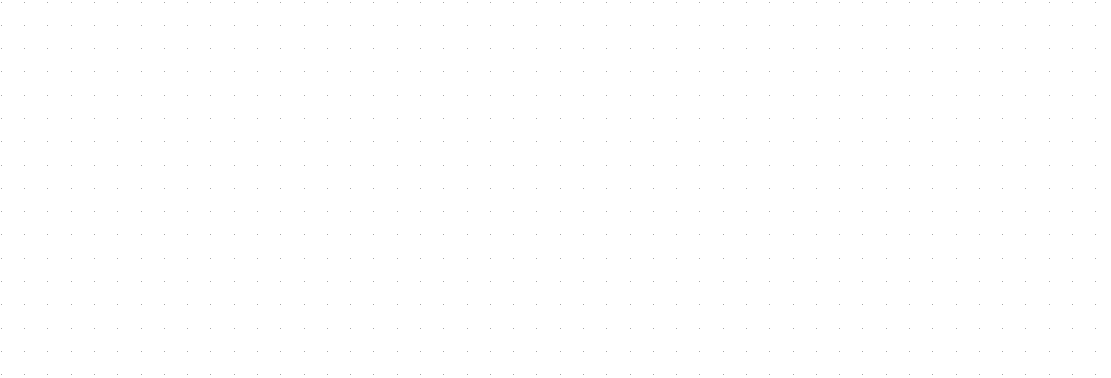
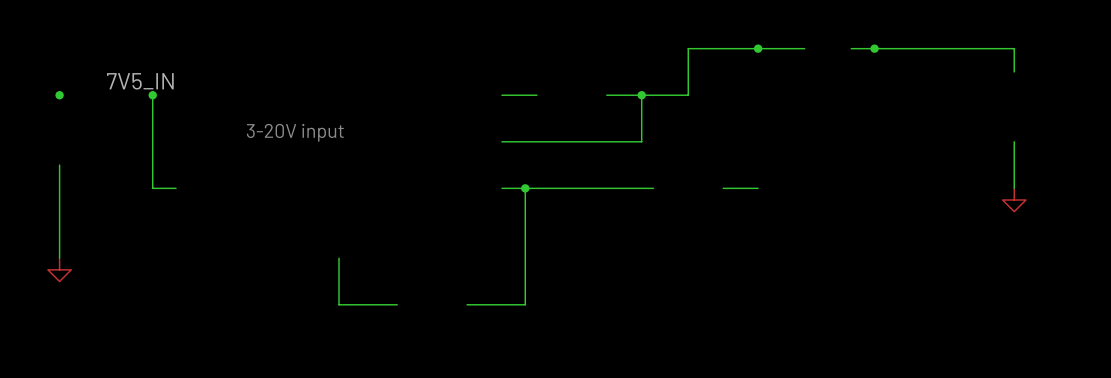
junction: none -> (758, 48)
wire: none -> (804, 48) (688, 48) (688, 95) (606, 95)
wire: none -> (851, 48) (1014, 48) (1014, 71)
junction: none -> (874, 48)
label: none -> 7V5_IN (140, 81)
junction: none -> (59, 95)
wire: none -> (152, 95) (152, 188) (176, 188)
junction: none -> (152, 95)
wire: none -> (501, 95) (536, 95)
wire: none -> (641, 95) (641, 141) (501, 141)
junction: none -> (641, 95)
text: none -> 3-20V input (295, 132)
wire: none -> (1014, 141) (1014, 188)
wire: none -> (59, 165) (59, 258)
wire: none -> (501, 188) (653, 188)
wire: none -> (525, 188) (525, 304) (467, 304)
junction: none -> (525, 188)
wire: none -> (723, 188) (758, 188)
power symbol: none -> (1014, 200)
wire: none -> (339, 258) (339, 304) (397, 304)
power symbol: none -> (59, 269)

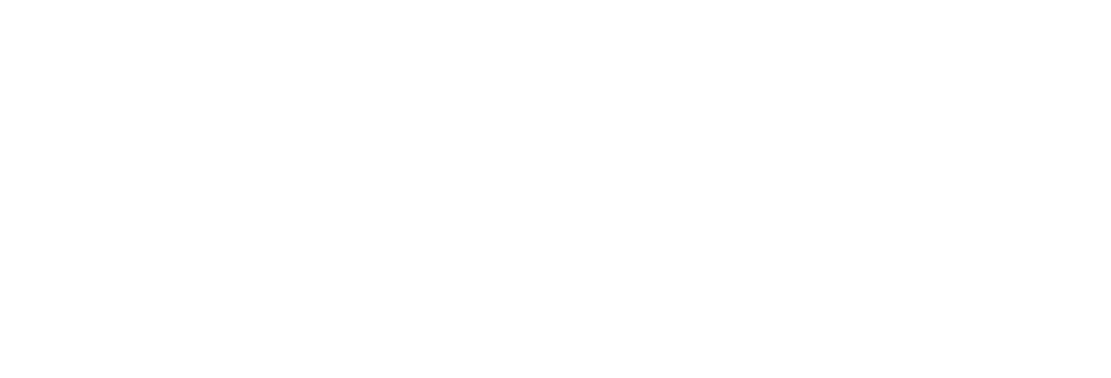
junction: (758, 48) -> none
wire: (804, 48) (688, 48) (688, 95) (606, 95) -> none
wire: (851, 48) (1014, 48) (1014, 71) -> none
junction: (874, 48) -> none
label: 7V5_IN (140, 81) -> none
junction: (59, 95) -> none
wire: (152, 95) (152, 188) (176, 188) -> none
junction: (152, 95) -> none
wire: (501, 95) (536, 95) -> none
wire: (641, 95) (641, 141) (501, 141) -> none
junction: (641, 95) -> none
text: 3-20V input (295, 132) -> none
wire: (1014, 141) (1014, 188) -> none
wire: (59, 165) (59, 258) -> none
wire: (501, 188) (653, 188) -> none
wire: (525, 188) (525, 304) (467, 304) -> none
junction: (525, 188) -> none
wire: (723, 188) (758, 188) -> none
power symbol: (1014, 200) -> none
wire: (339, 258) (339, 304) (397, 304) -> none
power symbol: (59, 269) -> none

